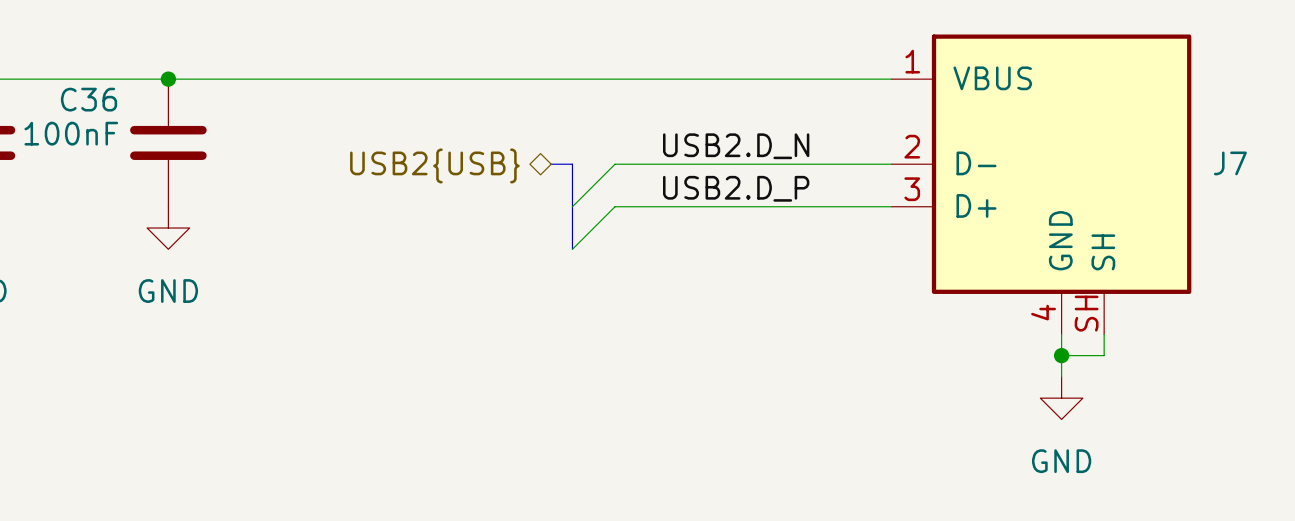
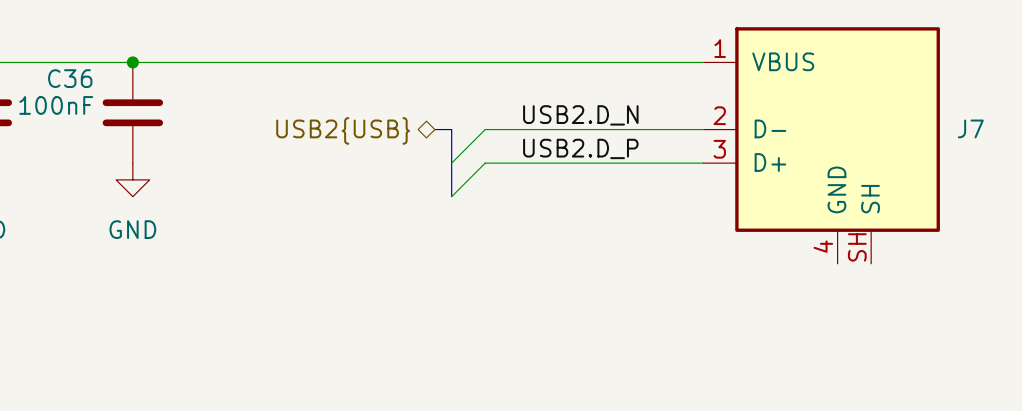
wire: (1061, 334) (1061, 376) -> none
wire: (1104, 334) (1104, 355) (1061, 355) -> none
junction: (1061, 355) -> none
power symbol: GND (1061, 398) -> none

